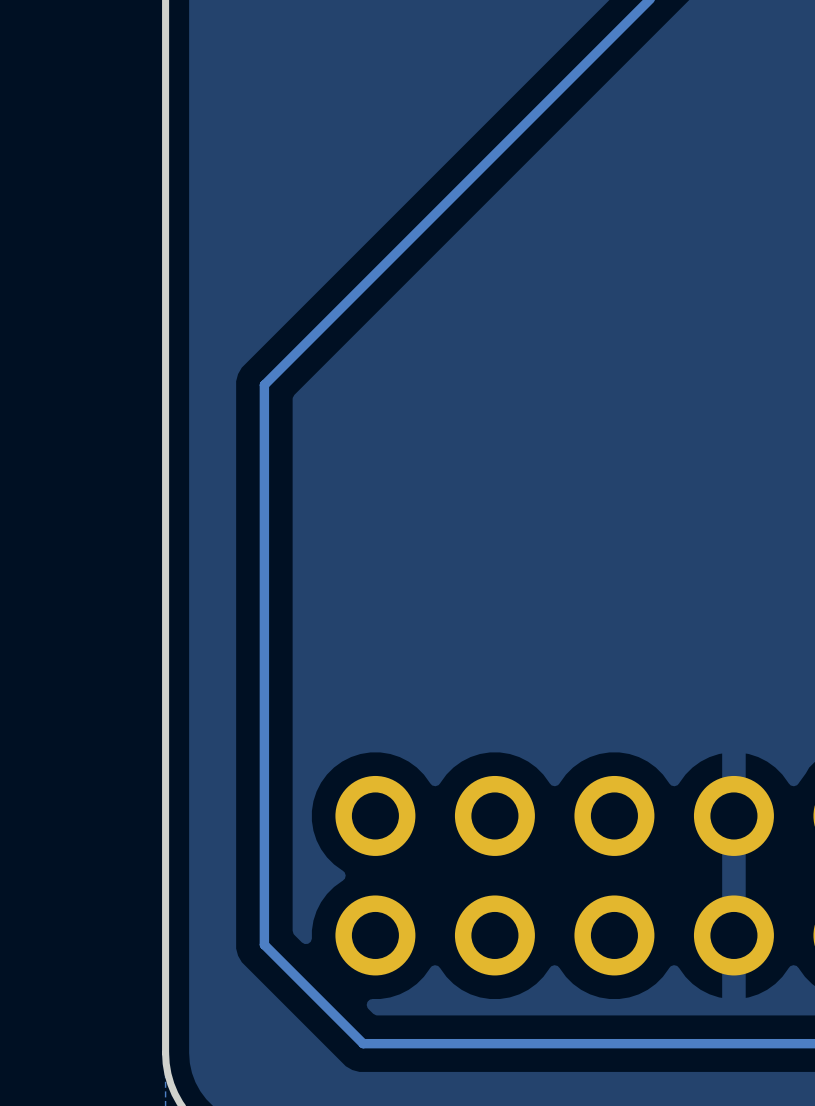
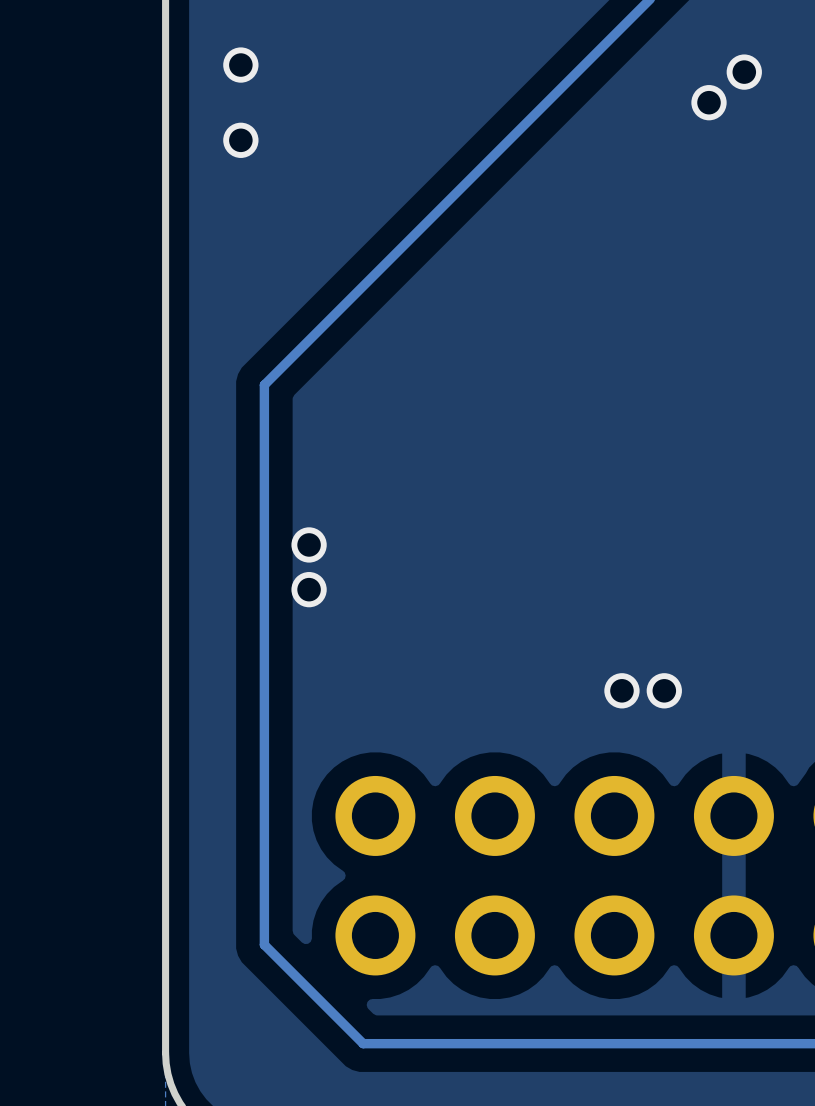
via: none -> (240, 65)
via: none -> (744, 72)
via: none -> (709, 102)
via: none -> (240, 140)
via: none -> (309, 544)
via: none -> (309, 589)
via: none -> (621, 690)
via: none -> (664, 690)

